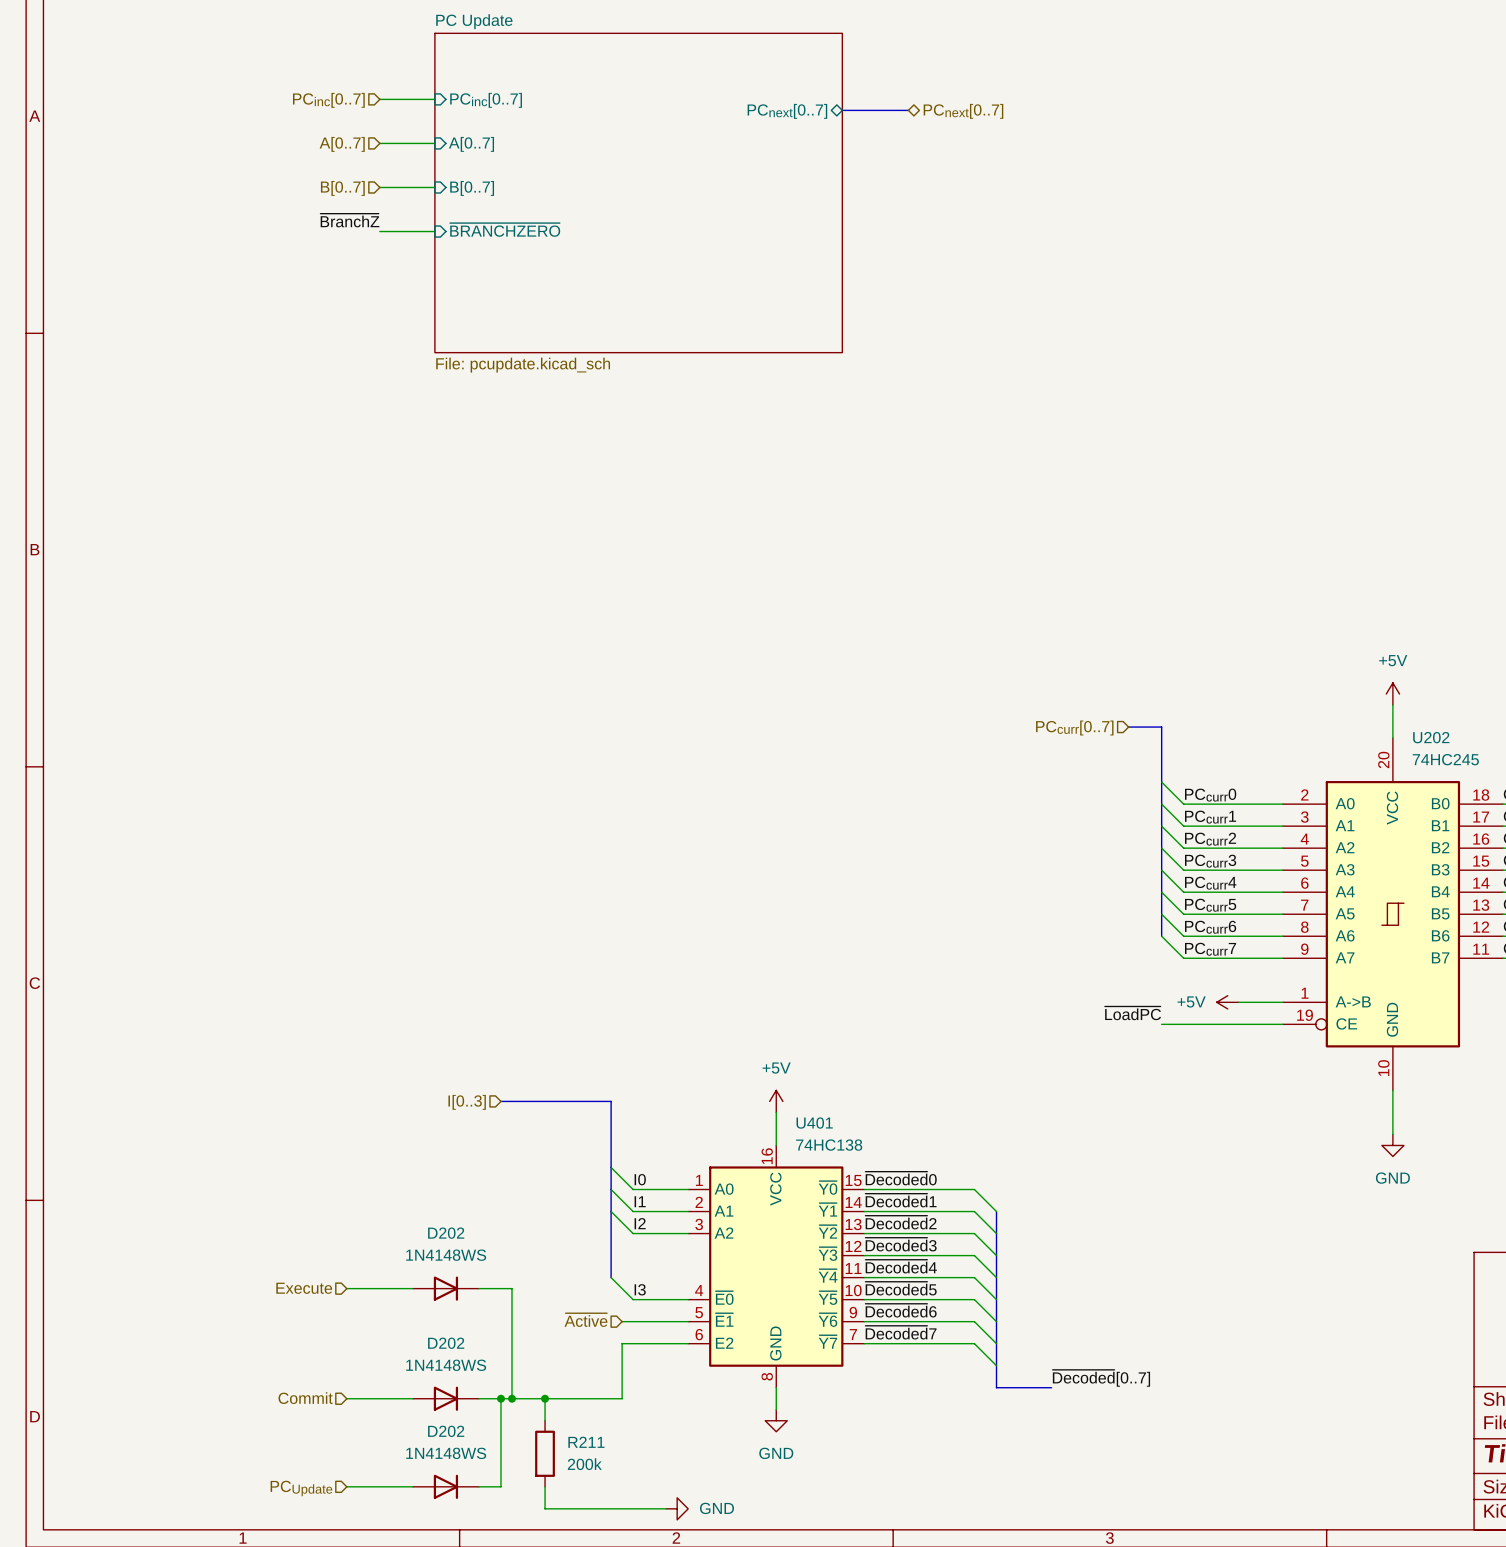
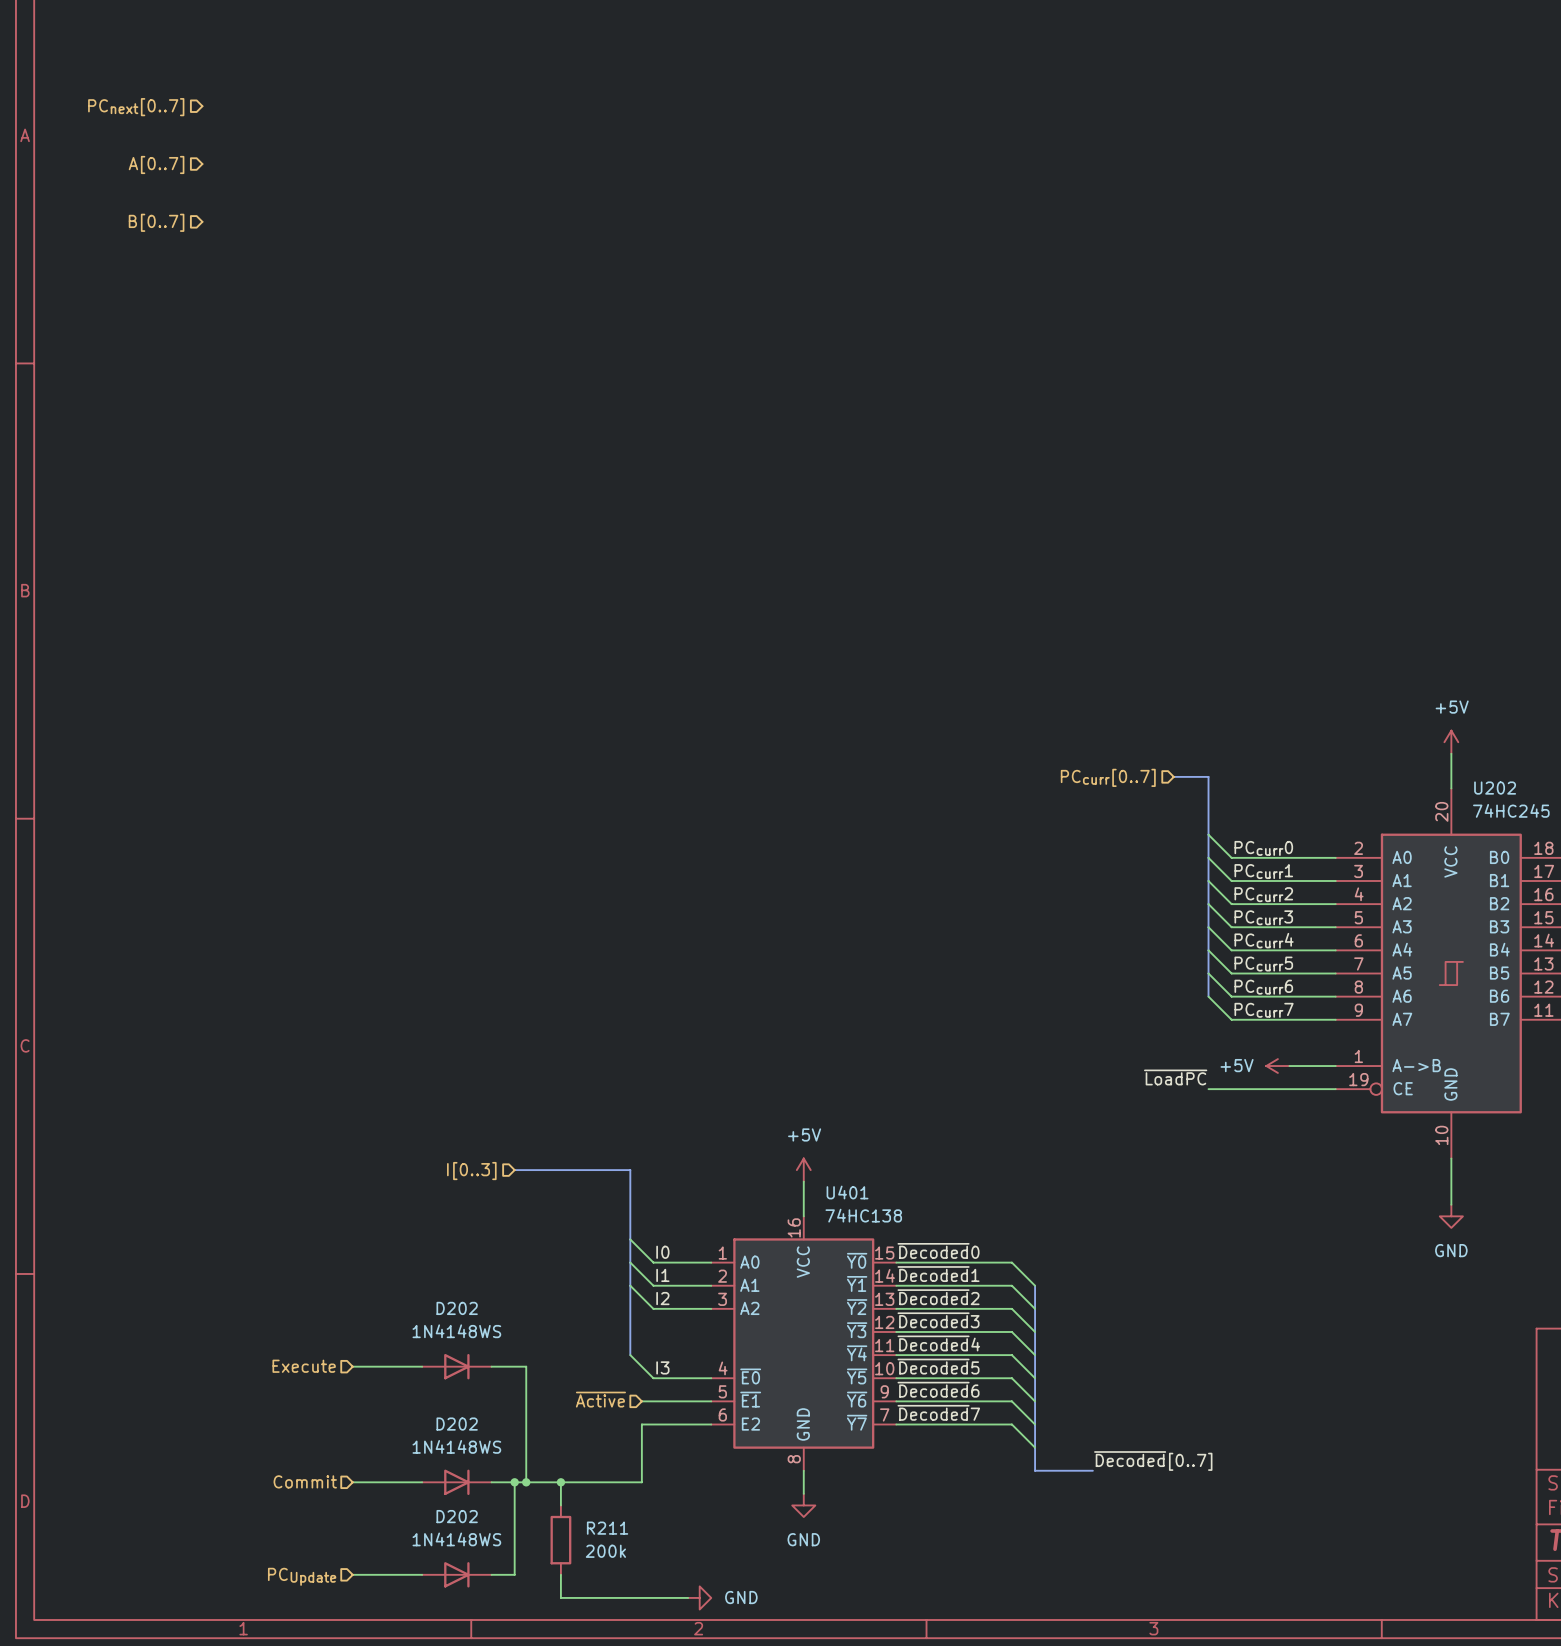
hierarchical label: none -> PCnext[0..7] (136, 107)
wire: (379, 99) (434, 99) -> none
hierarchical label: PCinc[0..7] (328, 100) -> none
sheet pin: PCinc[0..7] (486, 100) -> none
bus: (842, 110) (908, 110) -> none
sheet pin: PCnext[0..7] (787, 111) -> none
hierarchical label: PCnext[0..7] (963, 111) -> none
wire: (379, 143) (434, 143) -> none
hierarchical label position: A[0..7] (342, 144) -> A[0..7] (156, 164)
sheet pin: A[0..7] (471, 144) -> none
wire: (379, 187) (434, 187) -> none
hierarchical label position: B[0..7] (342, 188) -> B[0..7] (156, 222)
sheet pin: B[0..7] (472, 188) -> none
sheet PC Update: File: pcupdate.kicad_sch (638, 192) -> none
label: ~{BranchZ} (349, 220) -> none
sheet pin: ~{BRANCHZERO} (505, 229) -> none
wire: (379, 231) (434, 231) -> none

